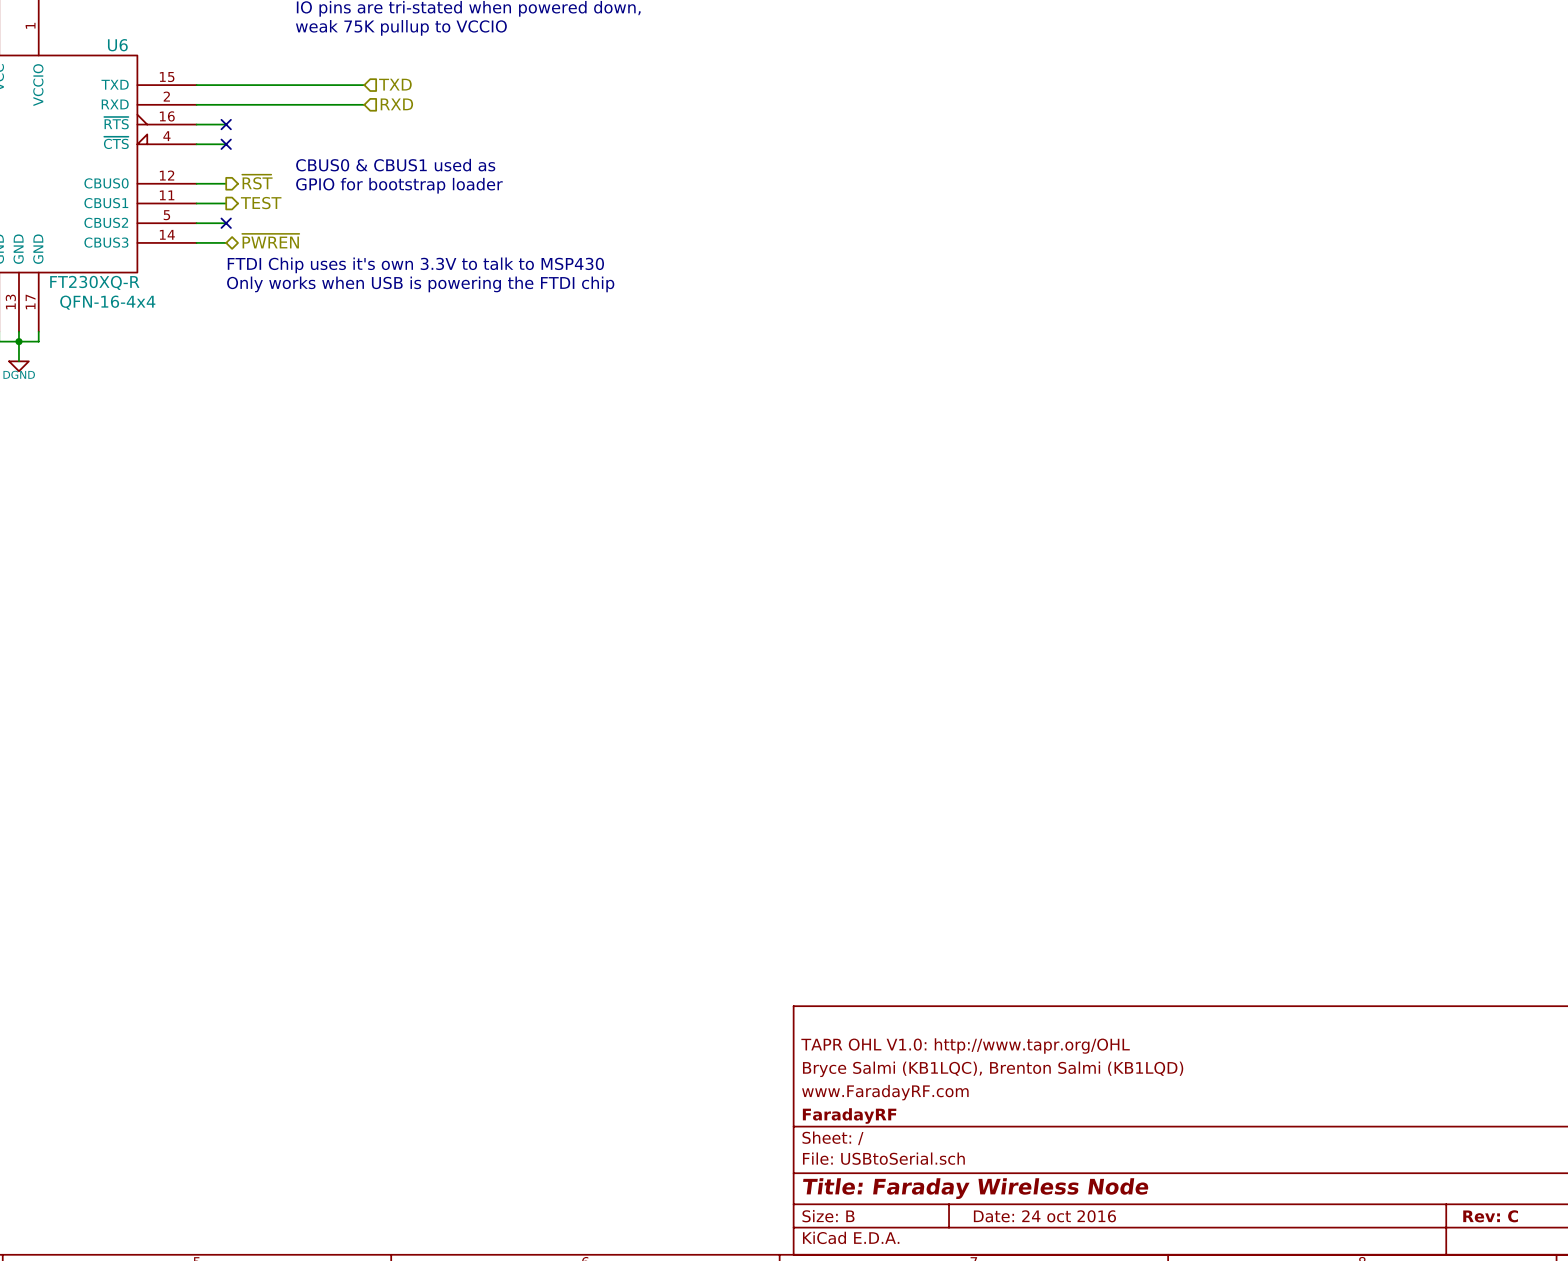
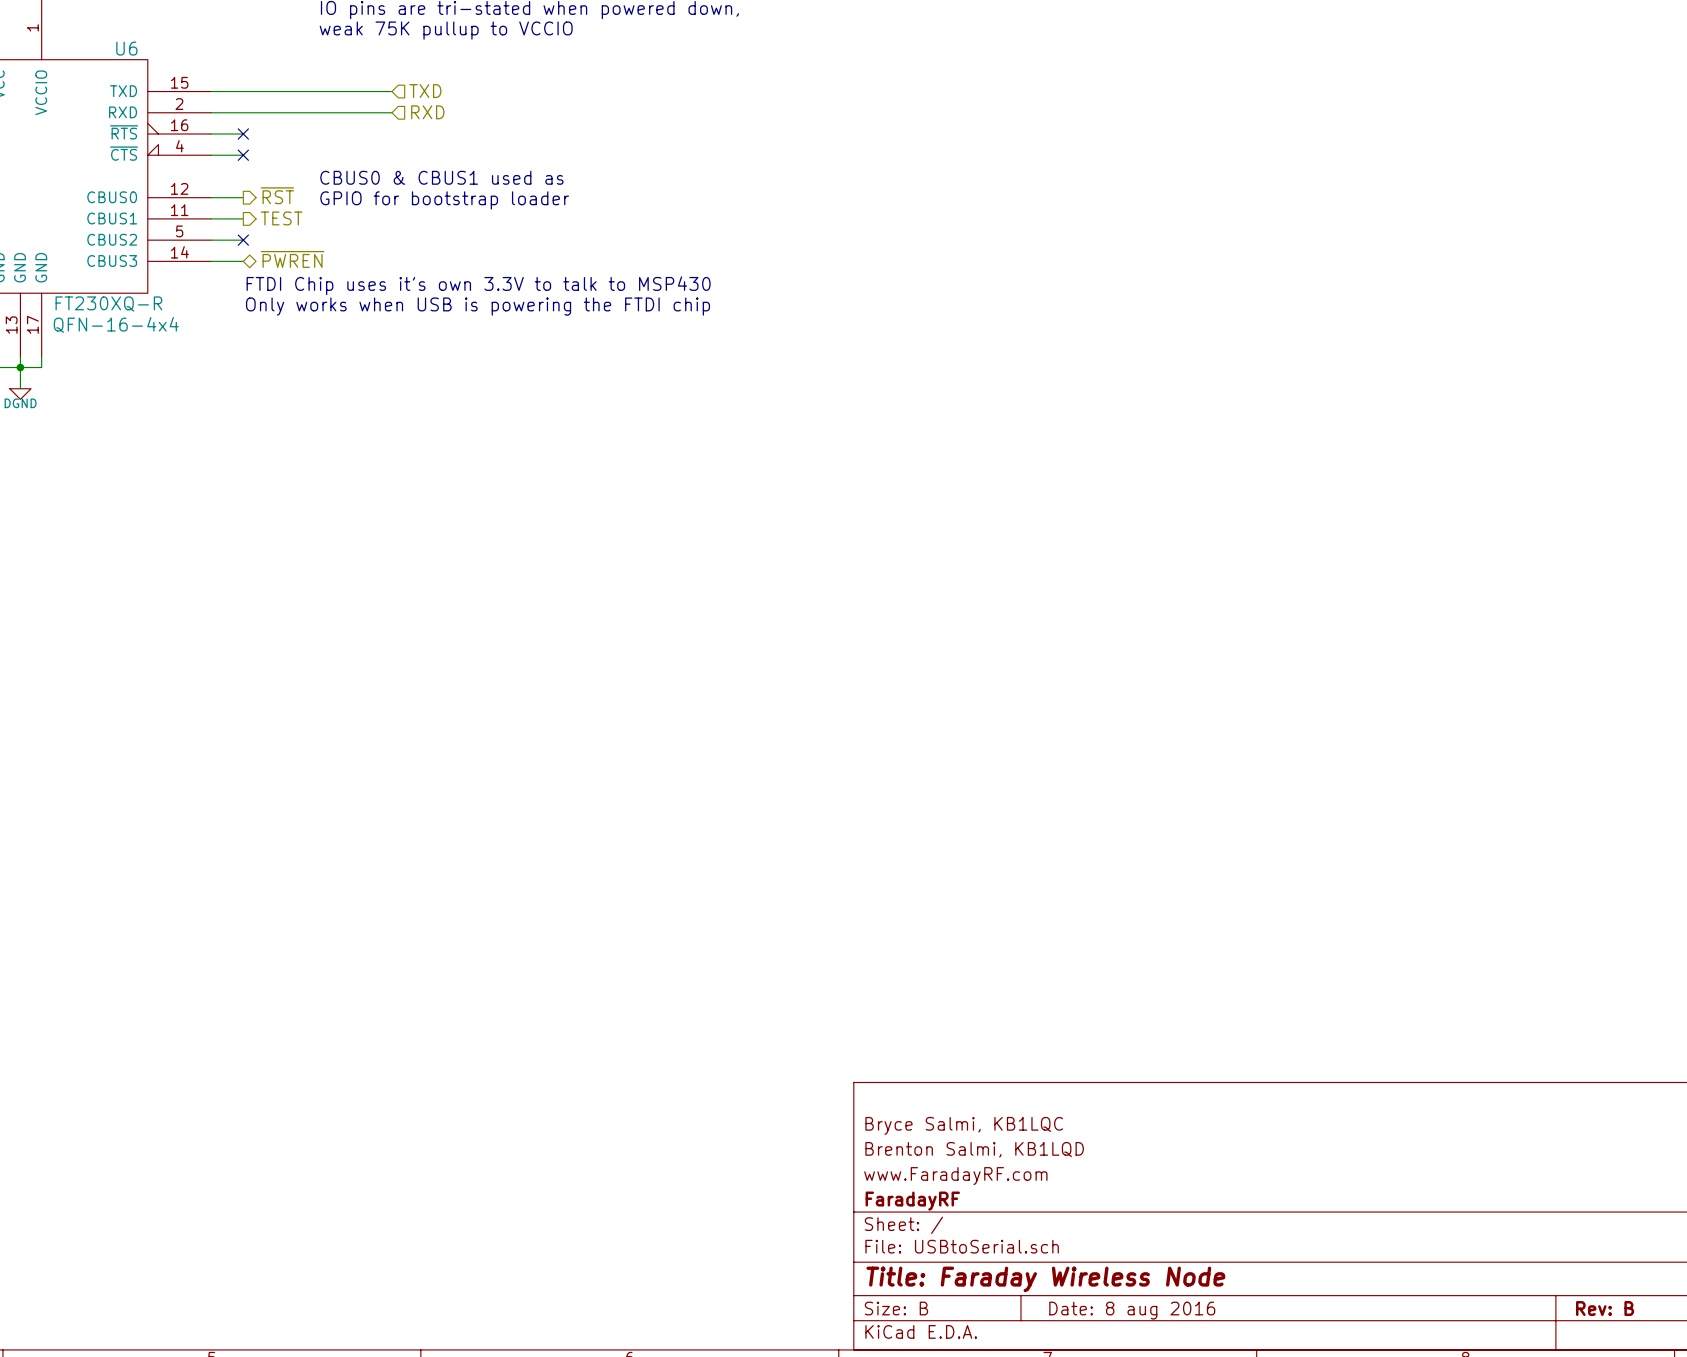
title block: TAPR OHL V1.0: http://www.tapr.org/OHL (965, 1046) -> Bryce Salmi, KB1LQC (964, 1125)
title block: Bryce Salmi (KB1LQC), Brenton Salmi (KB1LQD) (993, 1069) -> Brenton Salmi, KB1LQD (974, 1149)
title block: Date: 24 oct 2016 (1044, 1216) -> Date: 8 aug 2016 (1132, 1310)
title block: Rev: C (1490, 1216) -> Rev: B (1605, 1308)

